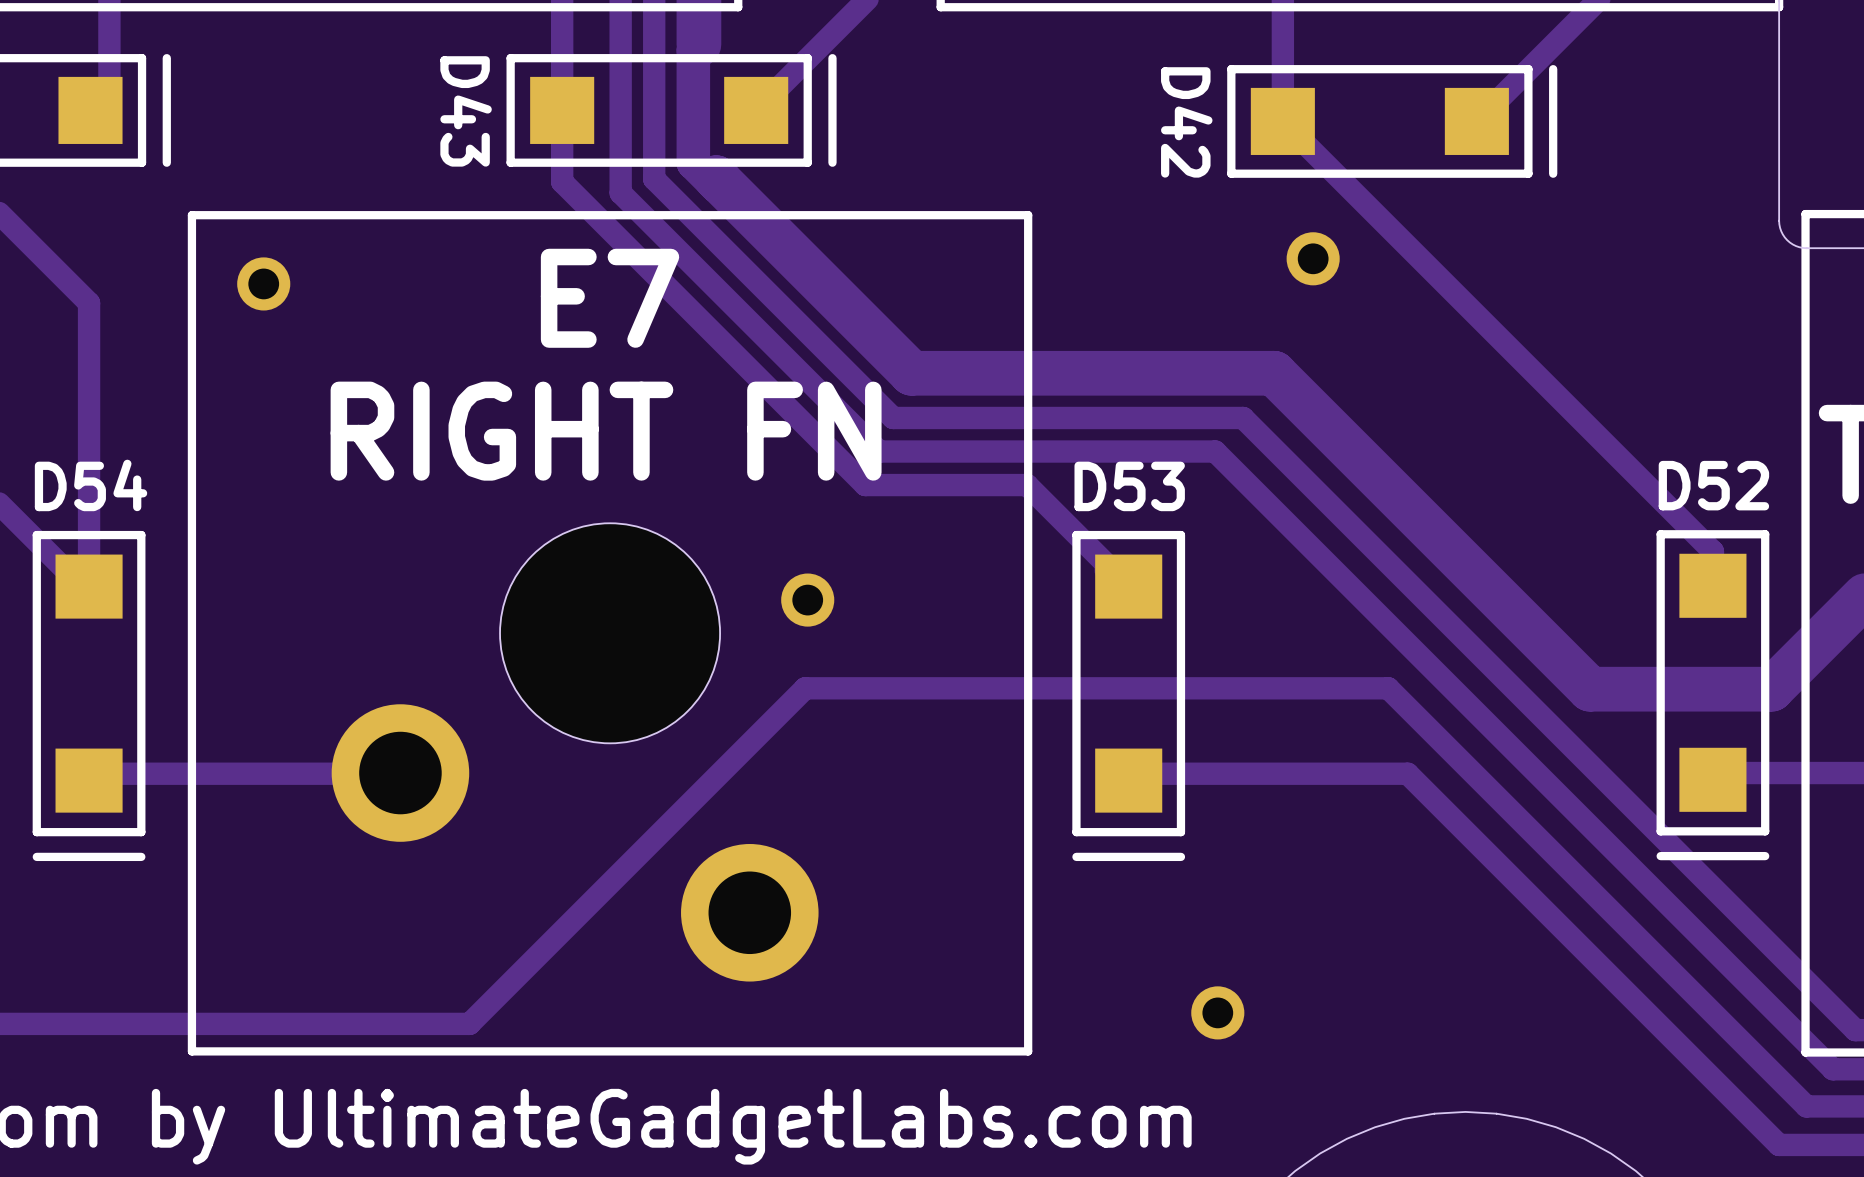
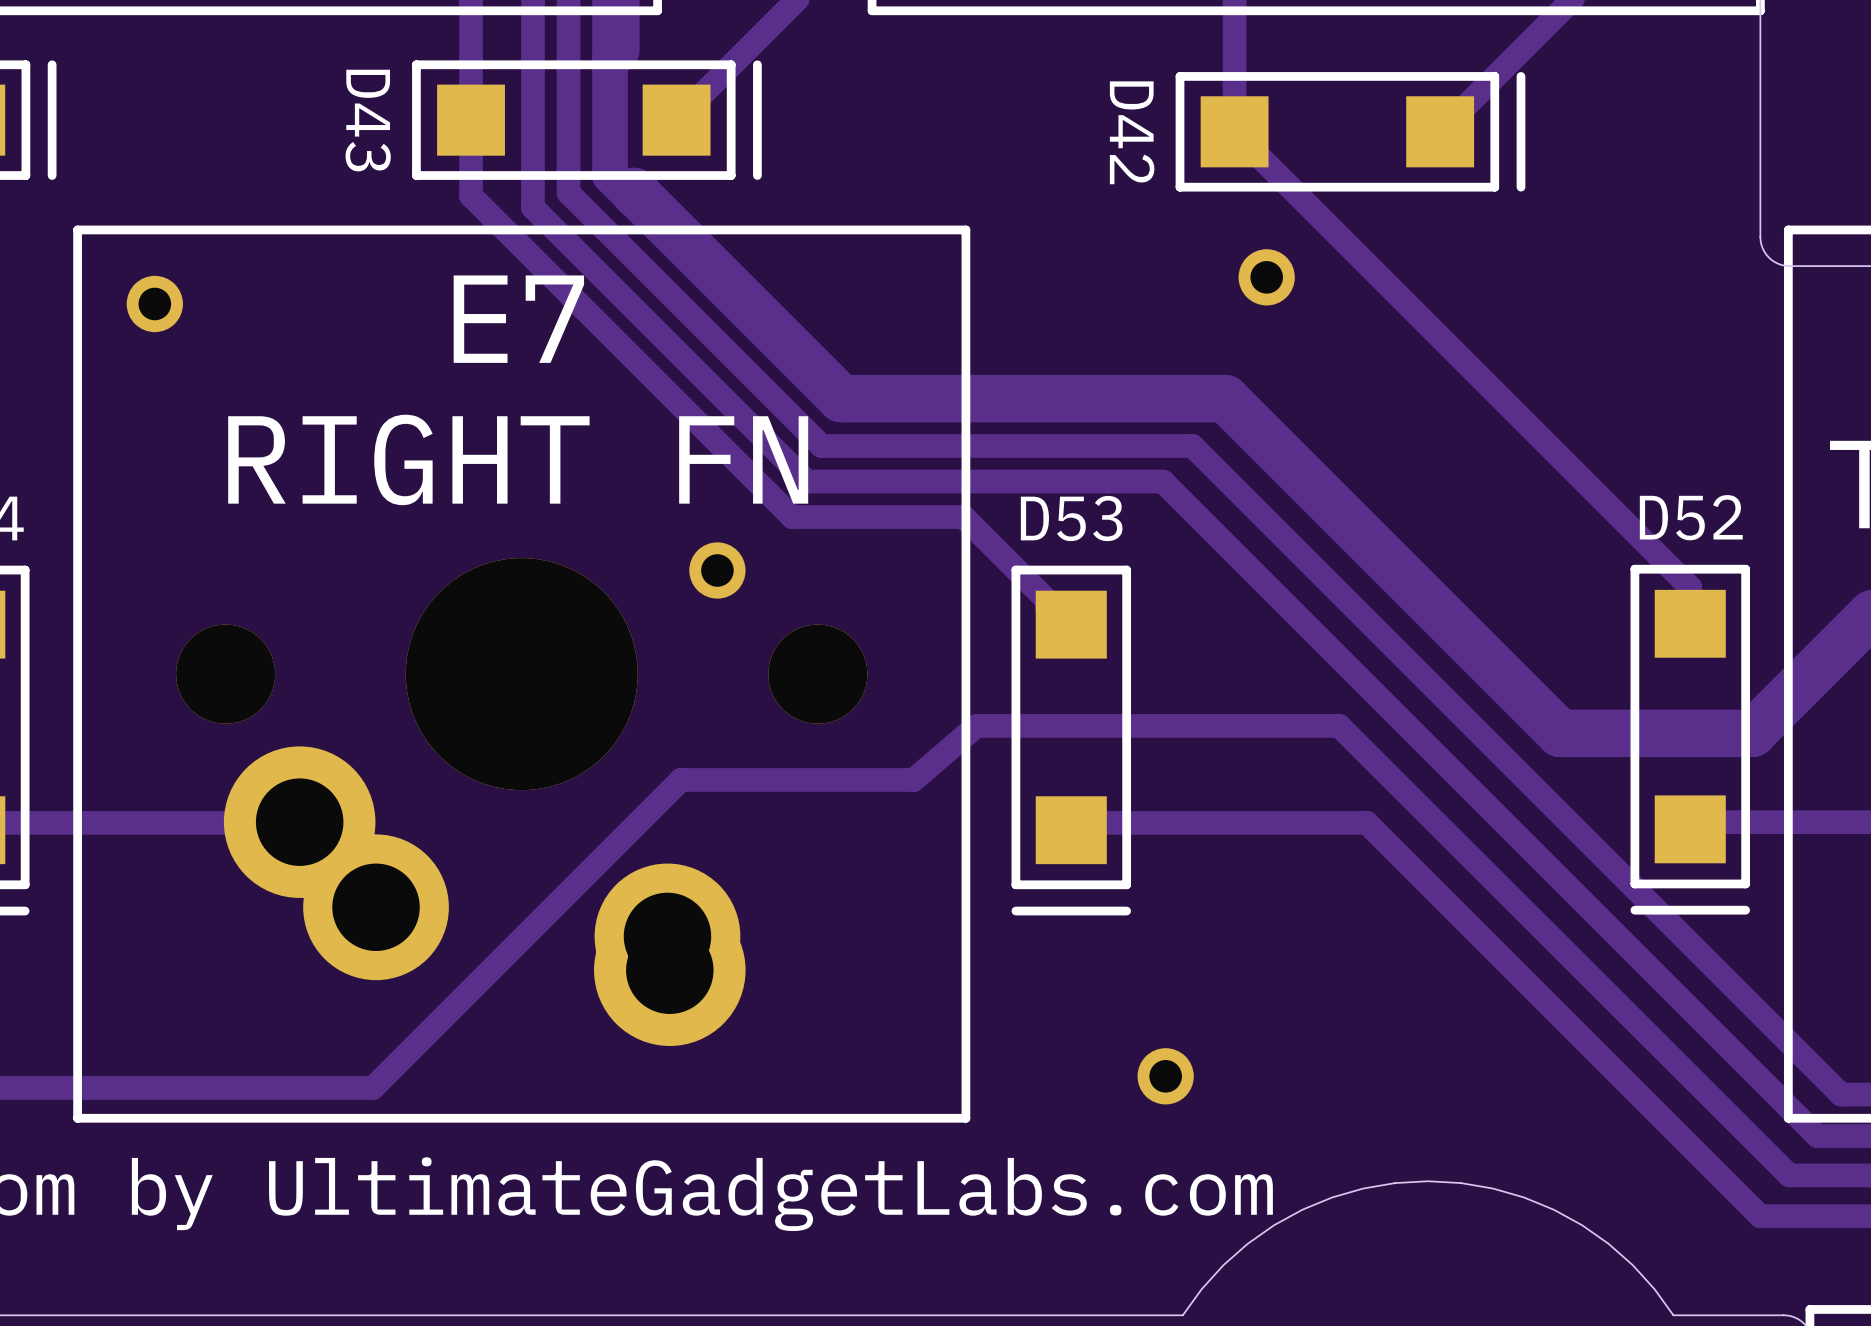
part footprint: [187, 211, 1033, 1056] -> [73, 225, 971, 1123]
part position: (807, 600) -> (717, 570)
track: (760, 733) (805, 688) (1388, 688) (1806, 1106) -> (680, 779) (913, 779) (976, 725) (1339, 725) (1789, 1175)

